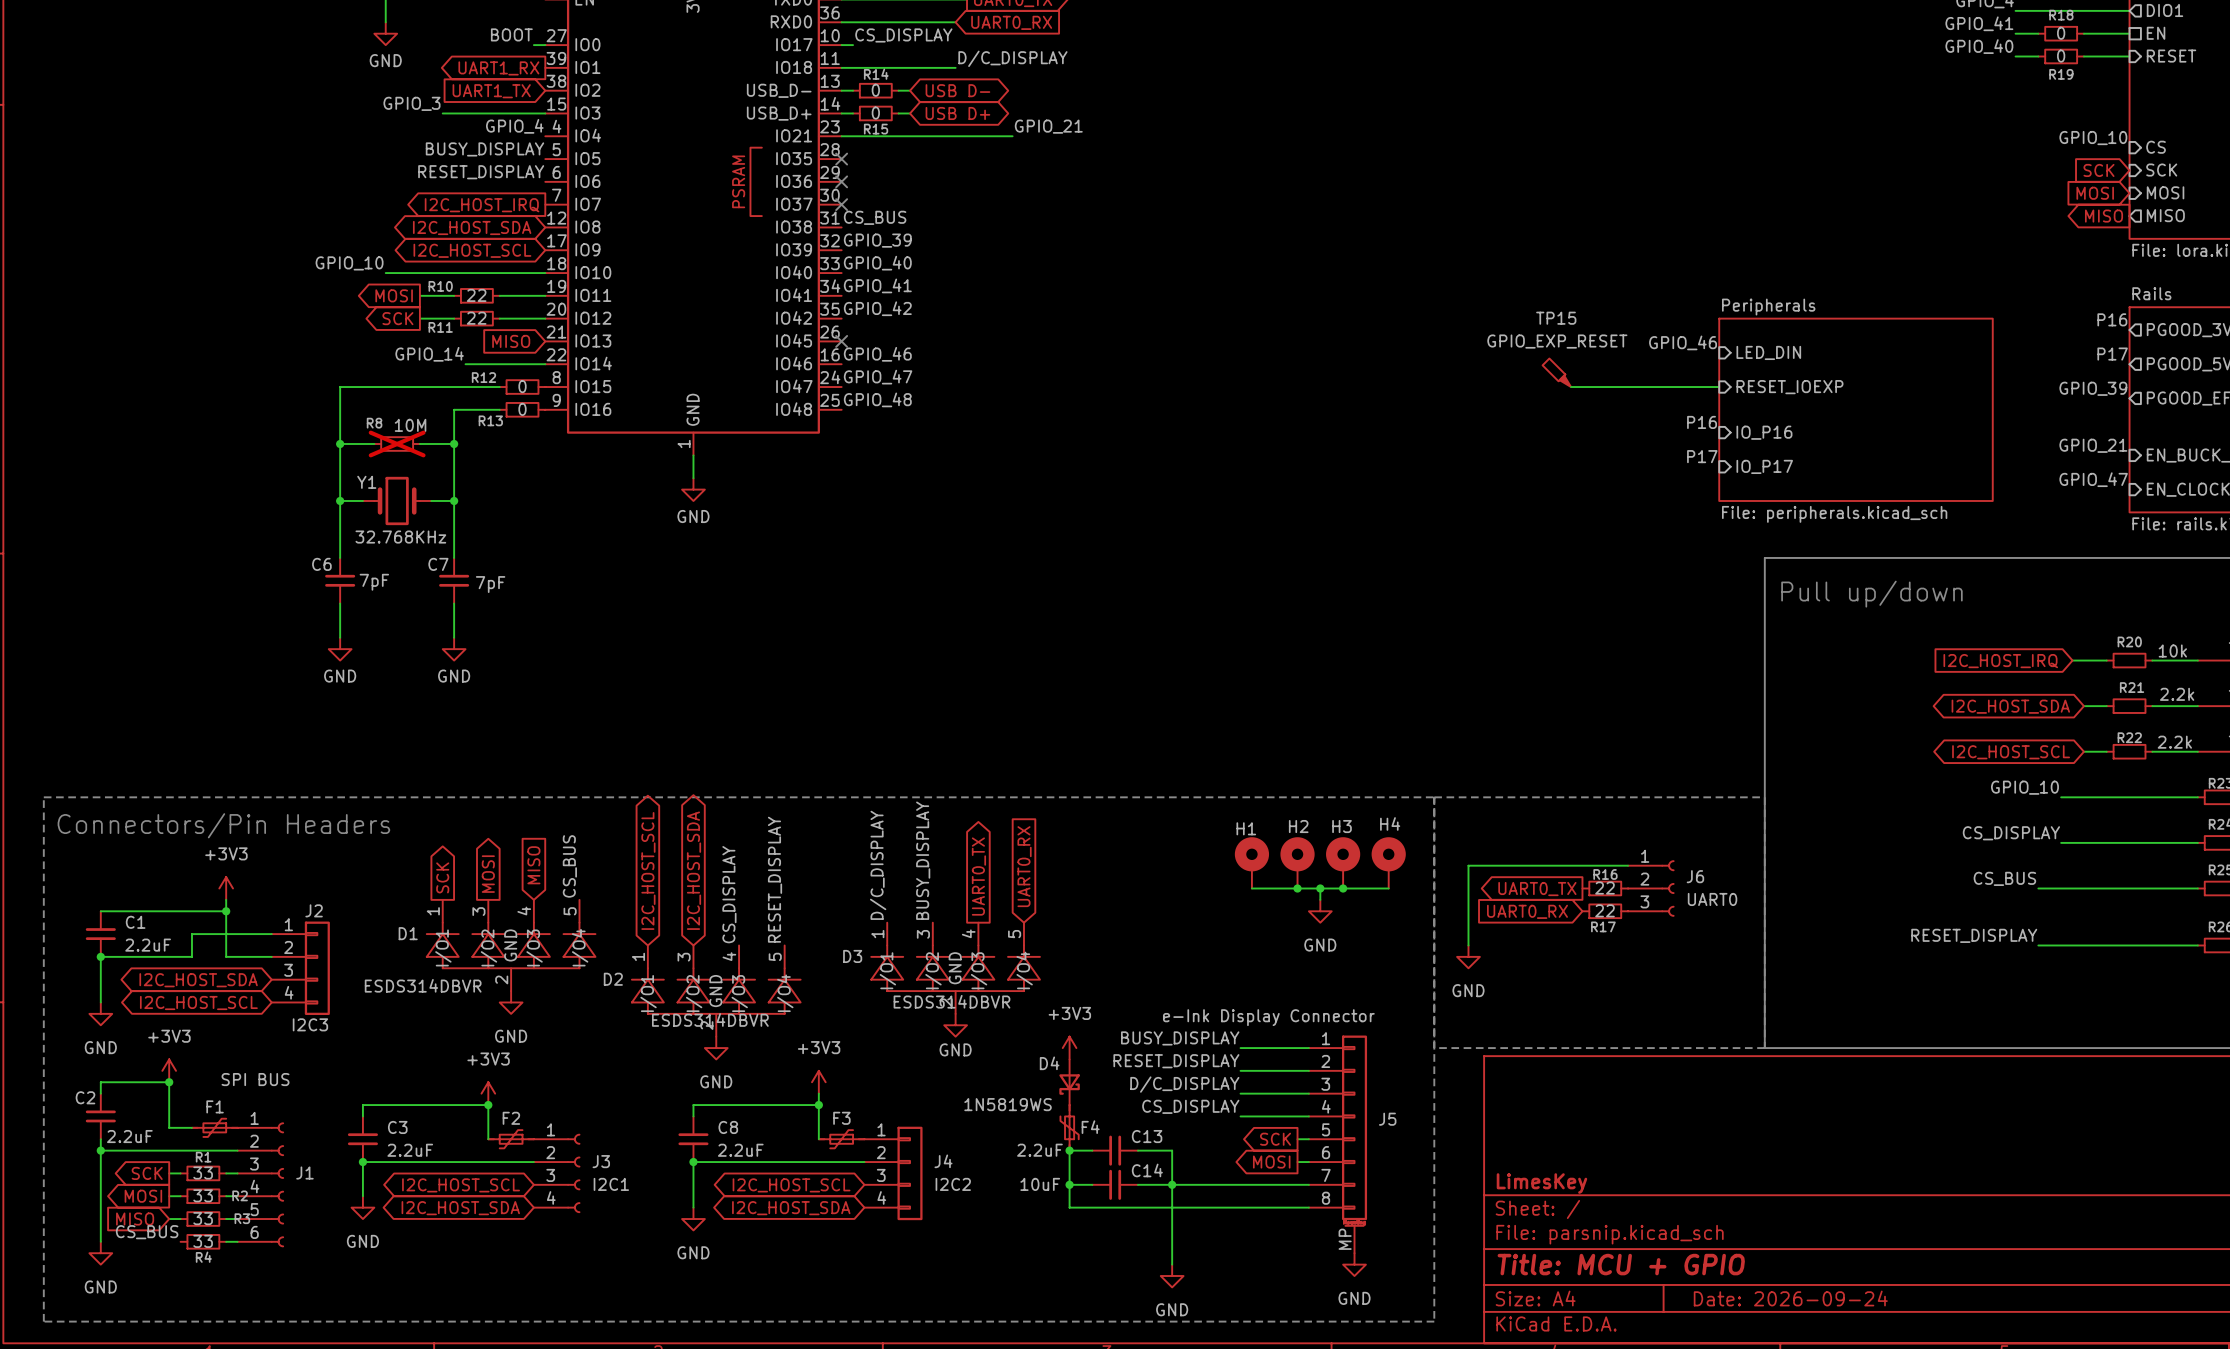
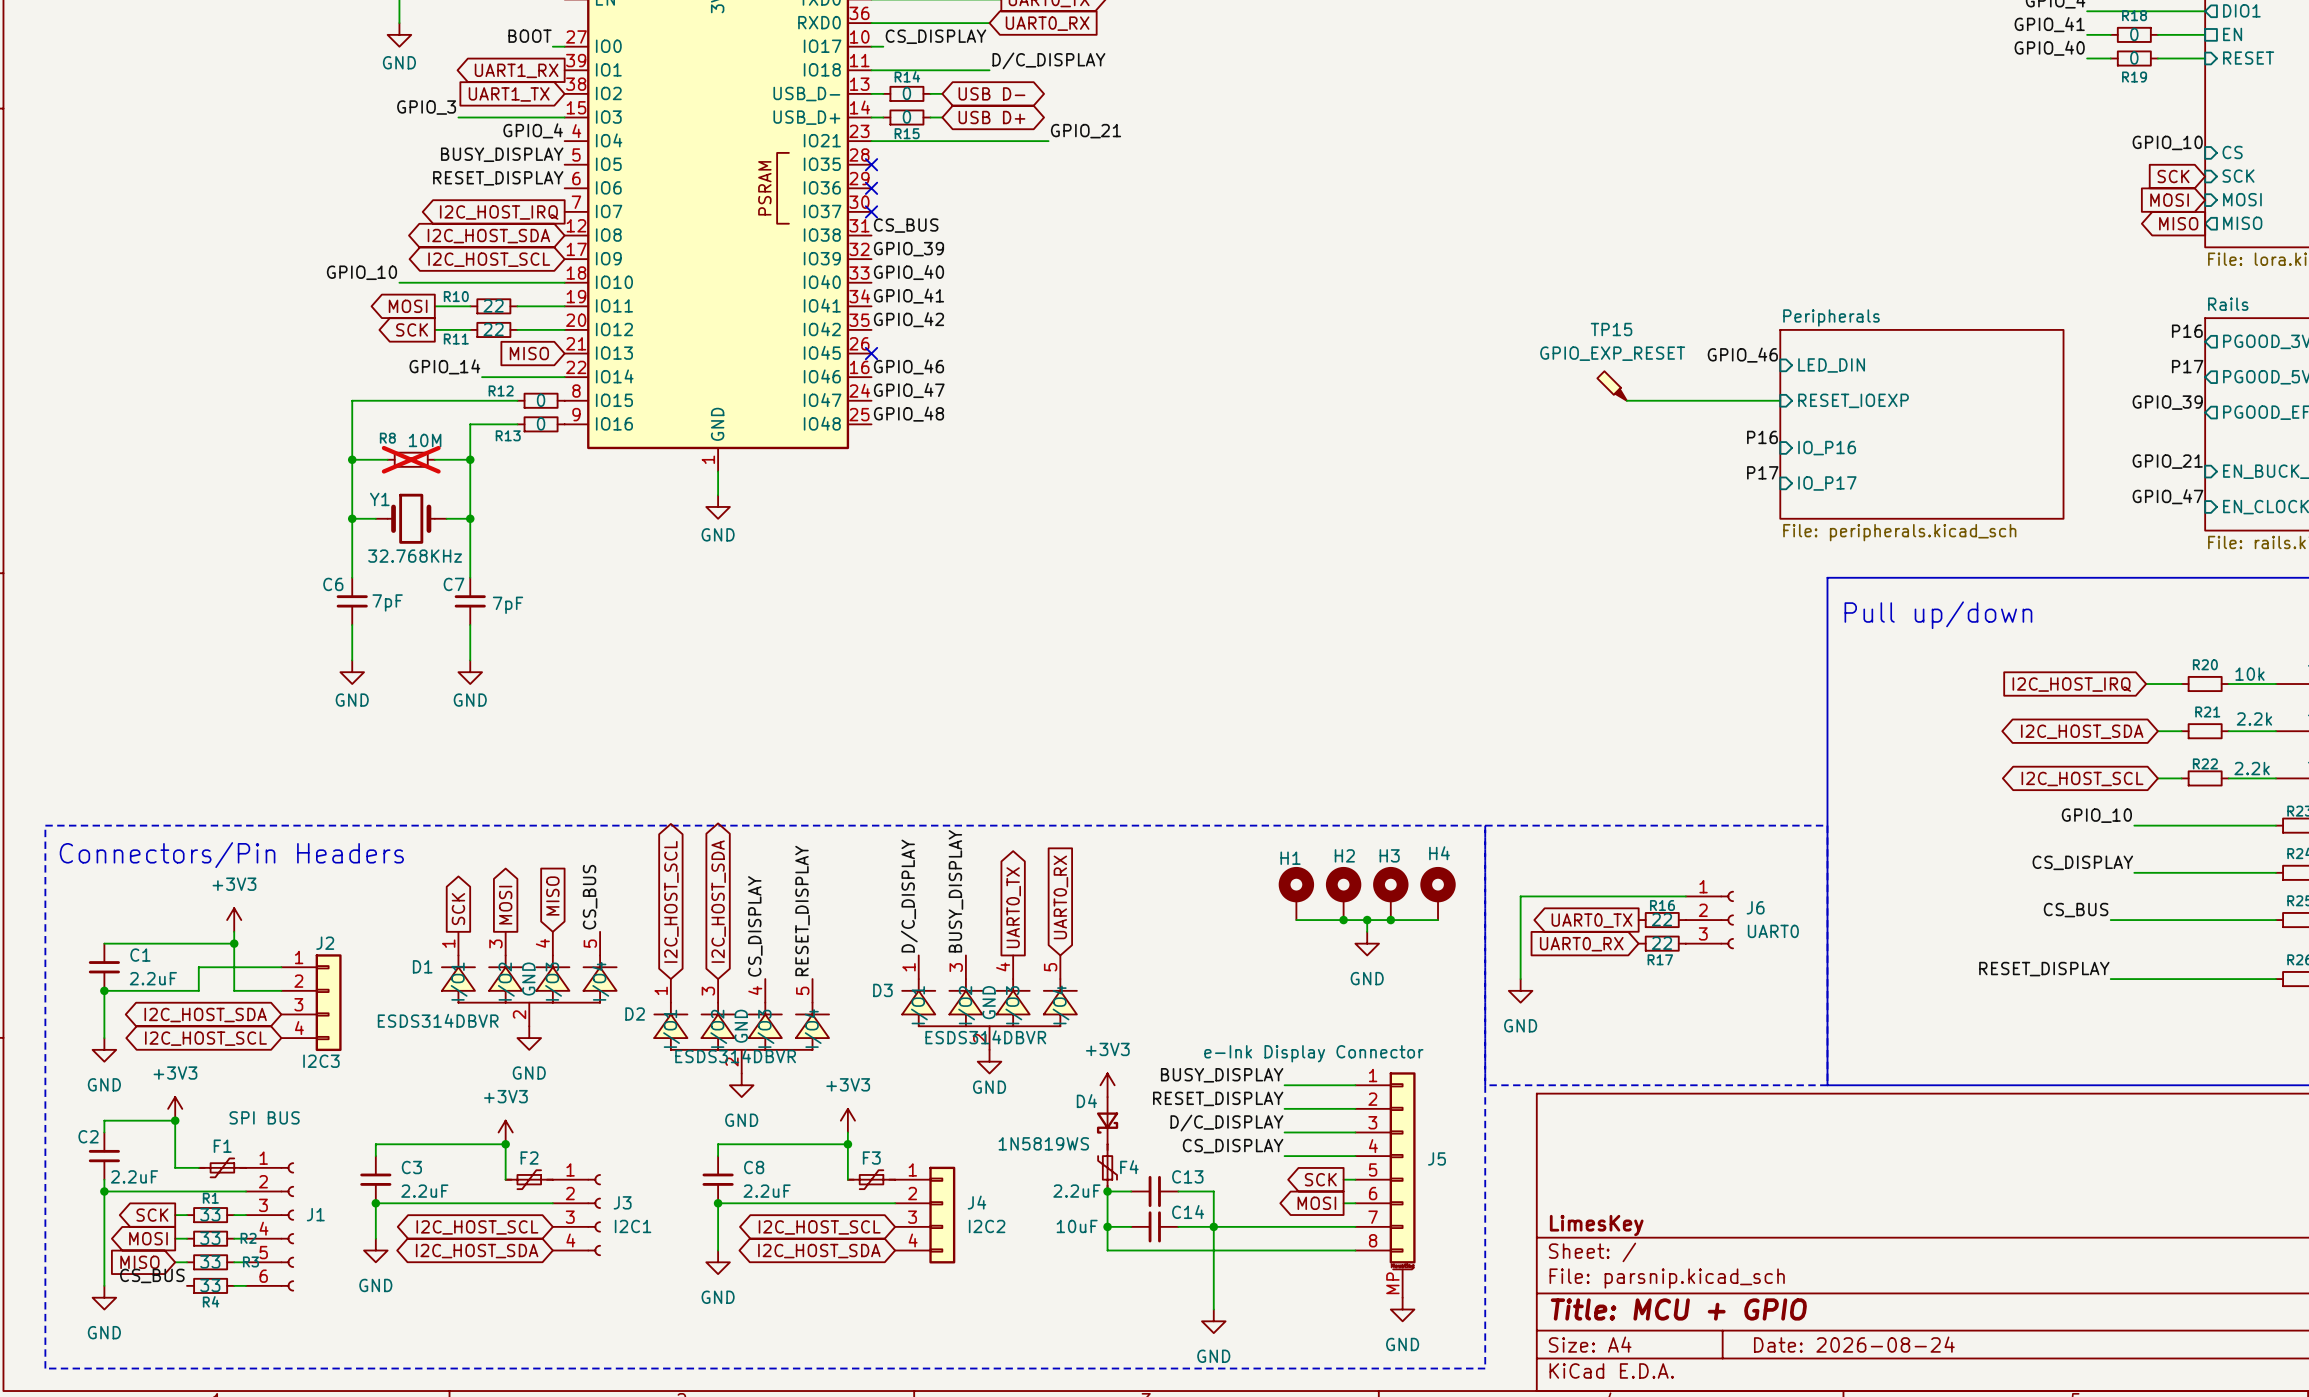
title block: Date: 2026-09-24 (1790, 1298) -> Date: 2026-08-24 (1854, 1344)

